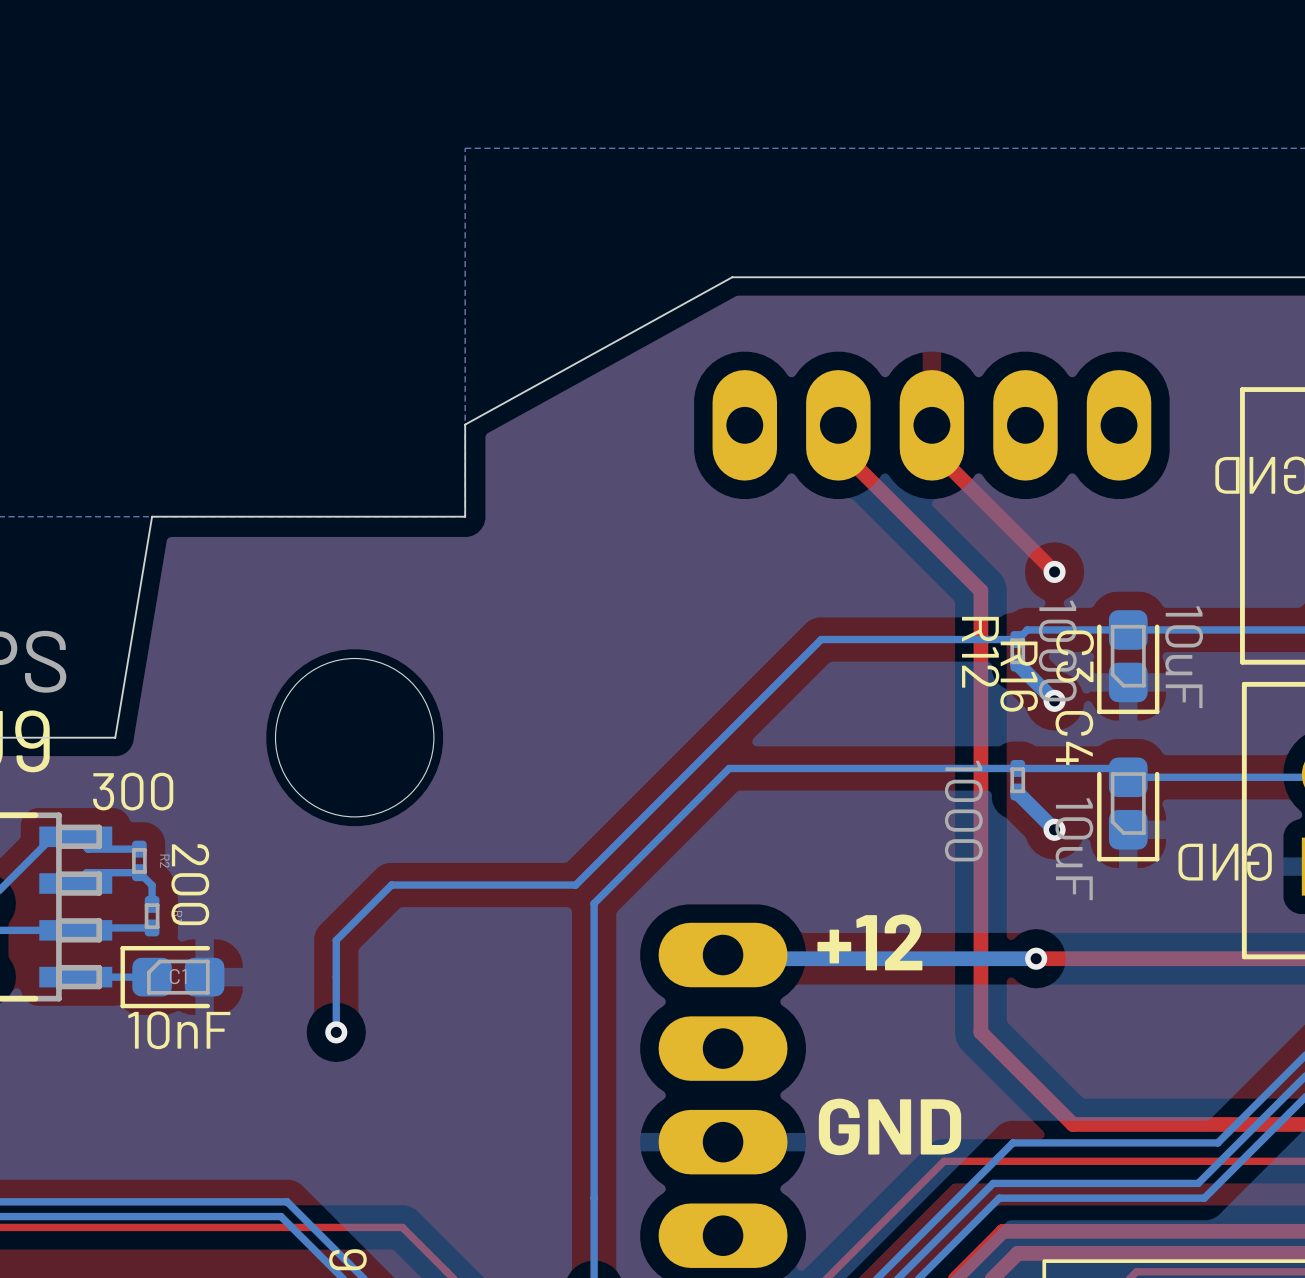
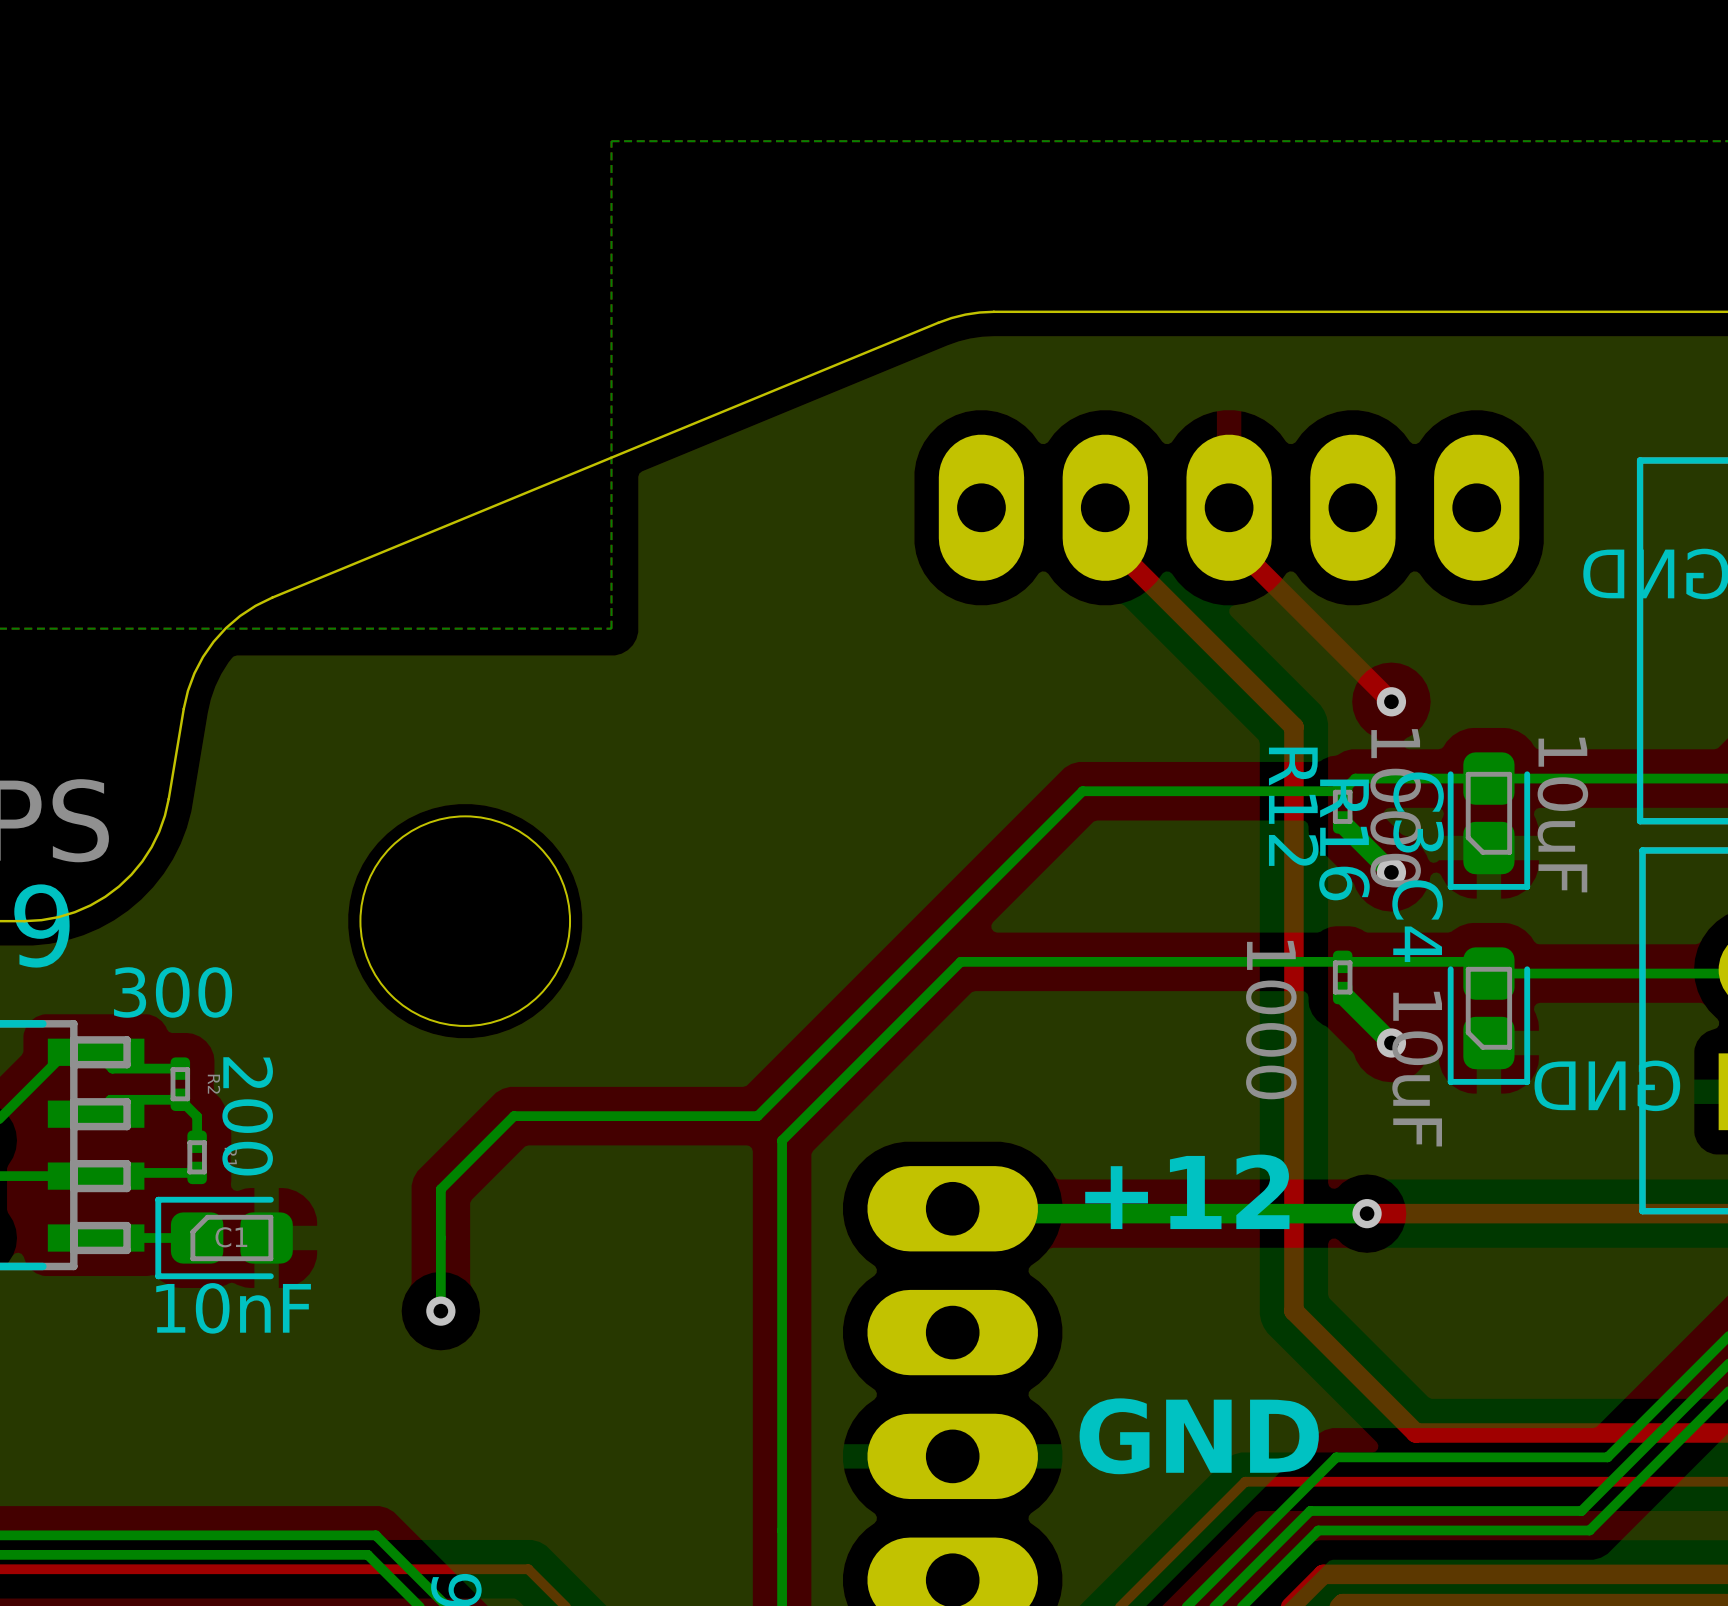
board edge: (754, 277) (732, 277) (465, 424) (465, 516) (152, 516) (142, 577) -> (993, 311) (965, 314) (938, 322) (255, 605) (226, 628) (213, 641) (194, 673) (183, 708)
board edge: (130, 645) (115, 737) (21, 737) -> (168, 798) (164, 815) (151, 847) (131, 874) (119, 886) (105, 896) (74, 912) (58, 917) (24, 921)

